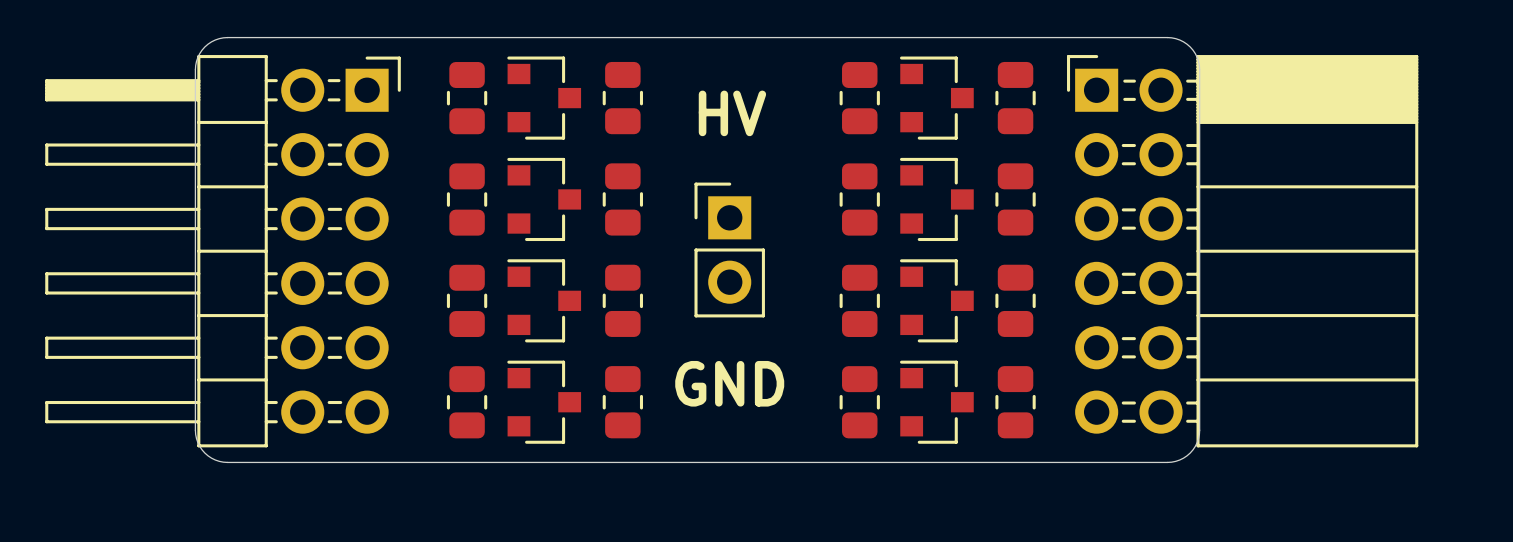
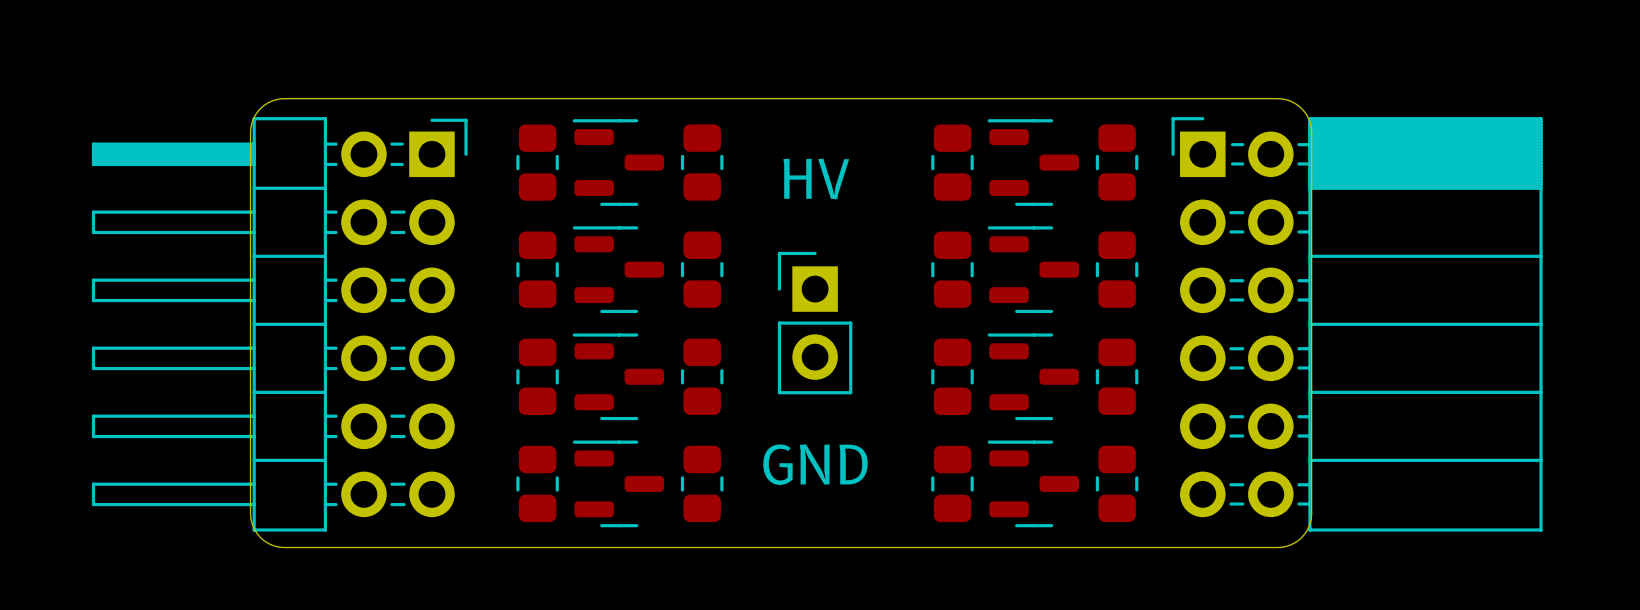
part footprint: [507, 56, 582, 140] -> [572, 119, 665, 206]
part footprint: [900, 56, 974, 140] -> [987, 119, 1079, 206]
part footprint: [507, 157, 582, 242] -> [572, 226, 665, 314]
part footprint: [900, 157, 974, 242] -> [987, 226, 1079, 314]
part footprint: [507, 259, 582, 343] -> [572, 333, 665, 421]
part footprint: [900, 259, 974, 343] -> [987, 333, 1079, 421]
part footprint: [507, 360, 582, 444] -> [572, 440, 665, 528]
part footprint: [900, 360, 974, 444] -> [987, 440, 1079, 528]

